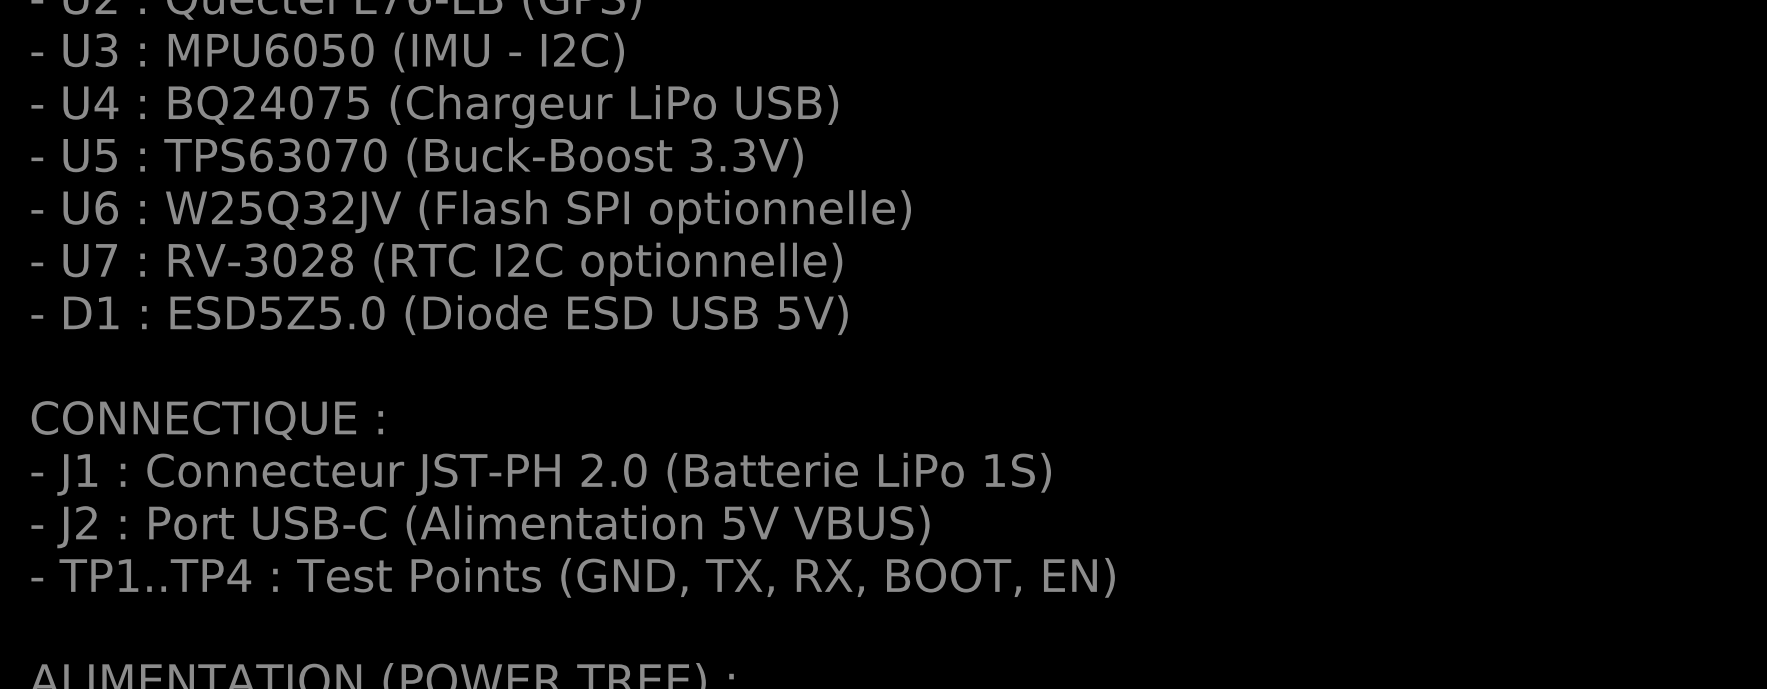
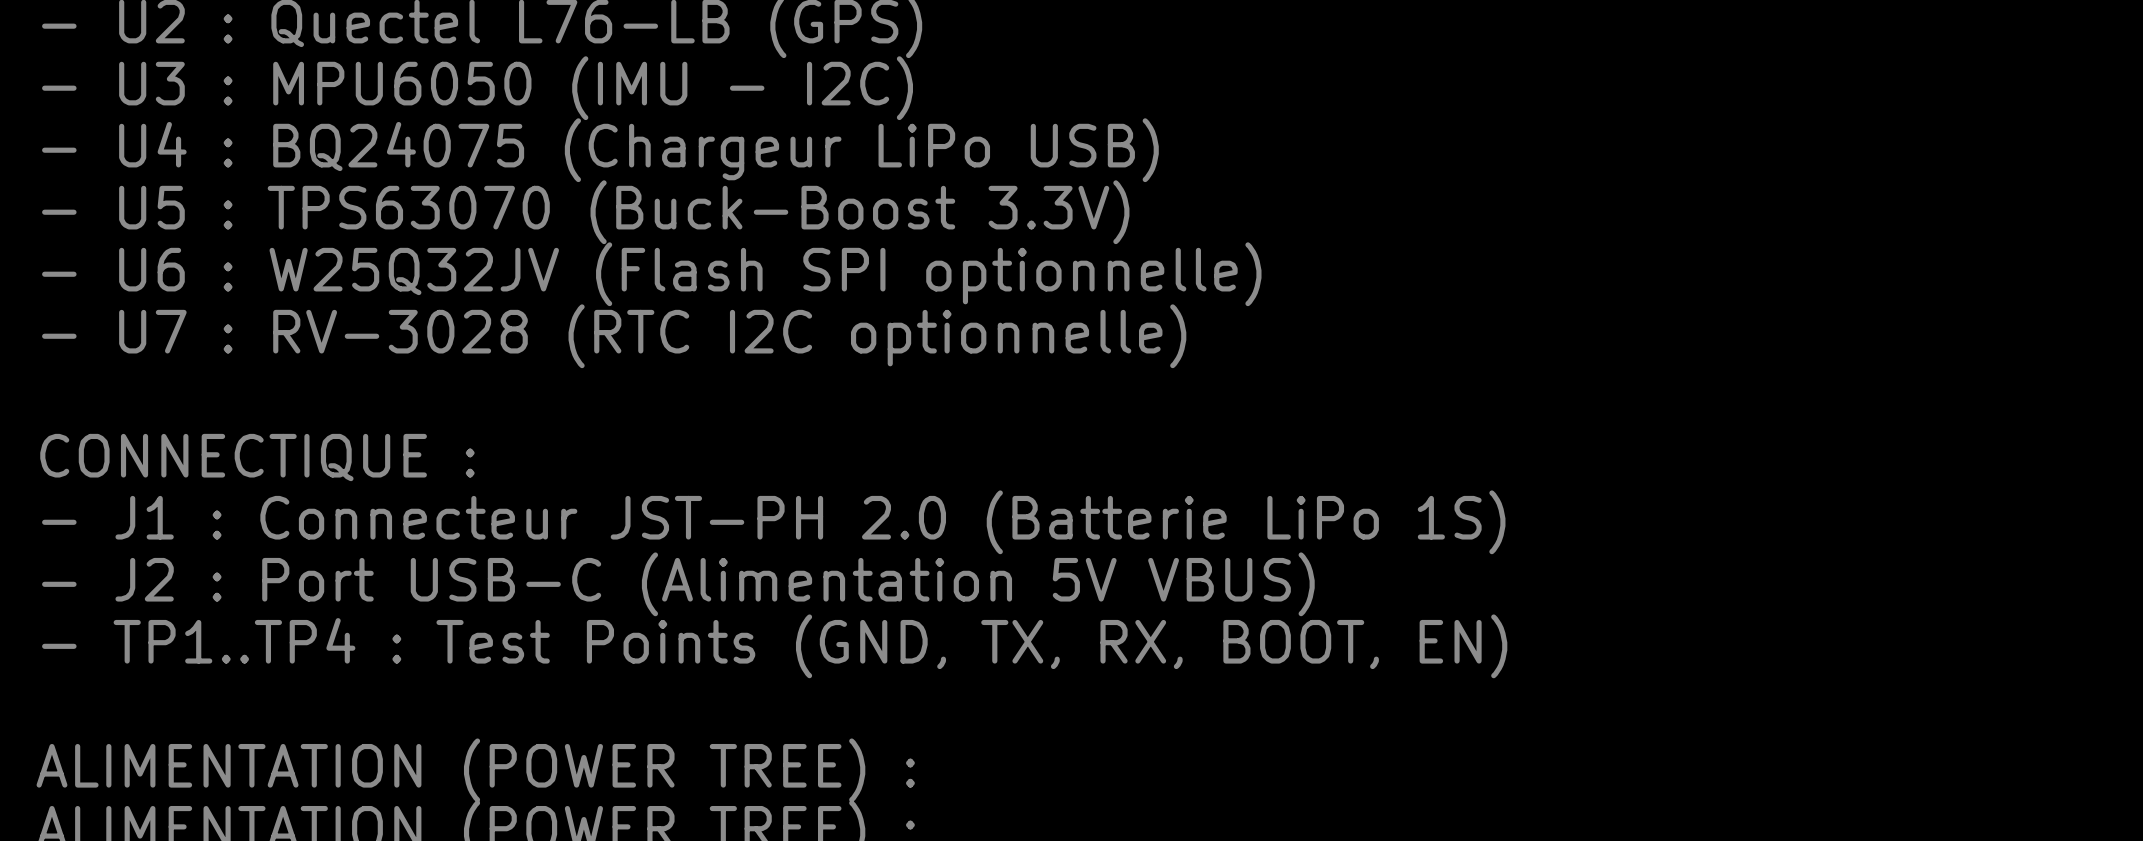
text: - D1 : ESD5Z5.0 (Diode ESD USB 5V) (439, 315) -> none
text: none -> CONNECTIQUE : (257, 457)
text: CONNECTIQUE : (207, 420) -> - J1 : Connecteur JST-PH 2.0 (Batterie LiPo 1S) (773, 522)
text: - J1 : Connecteur JST-PH 2.0 (Batterie LiPo 1S) (541, 474) -> - J2 : Port USB-C (Alimentation 5V VBUS) (678, 584)
text: - J2 : Port USB-C (Alimentation 5V VBUS) (480, 526) -> - TP1..TP4 : Test Points (GND, TX, RX, BOOT, EN) (774, 646)
text: - TP1..TP4 : Test Points (GND, TX, RX, BOOT, EN) (573, 577) -> none
text: none -> ALIMENTATION (POWER TREE) : (475, 770)

